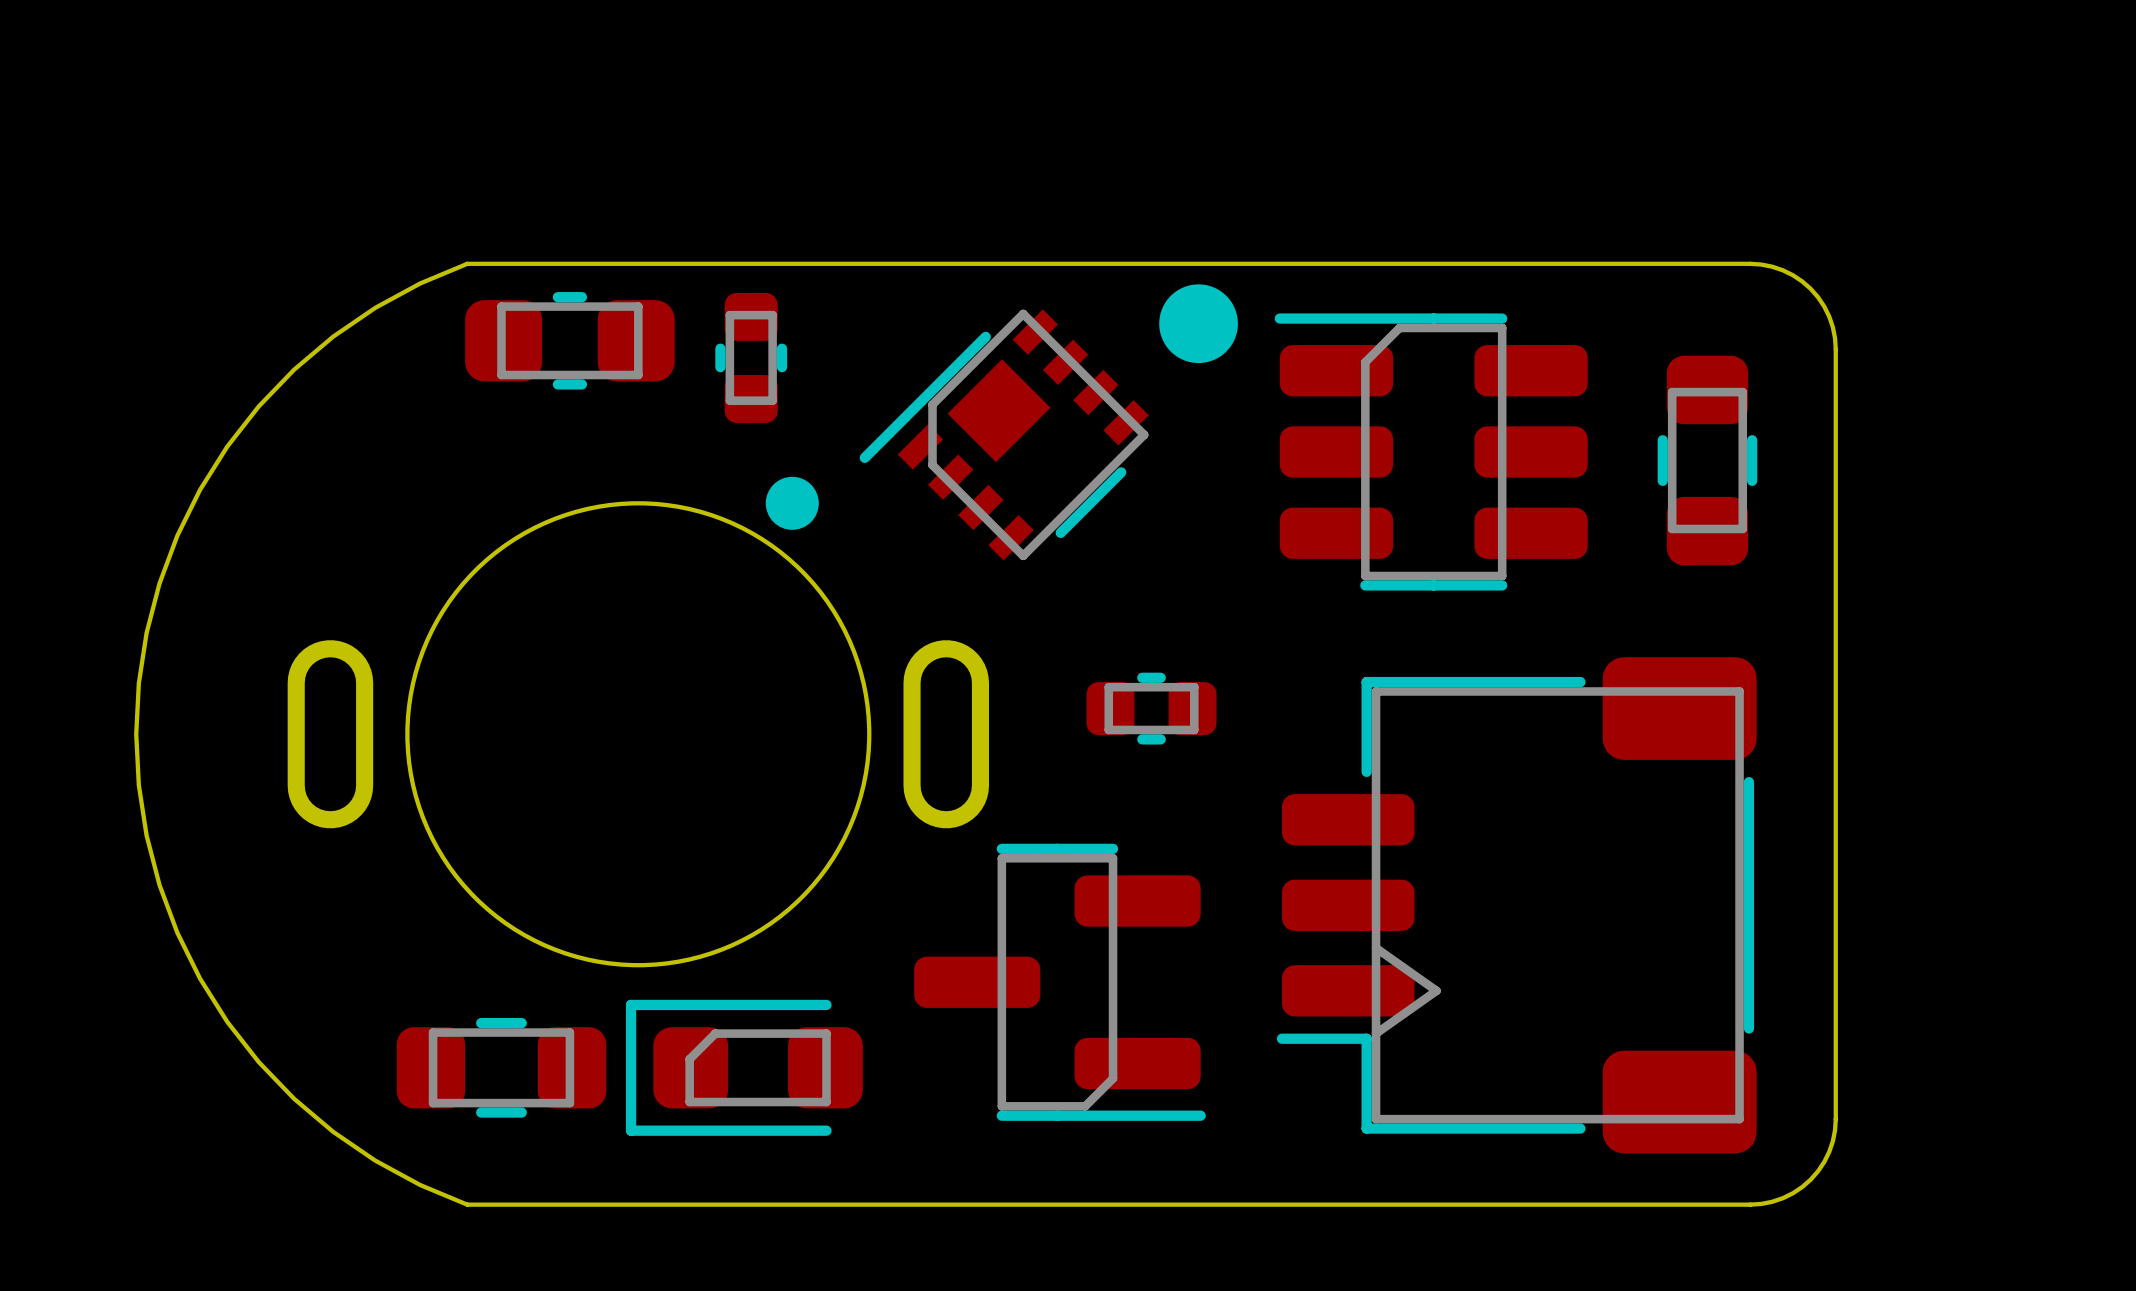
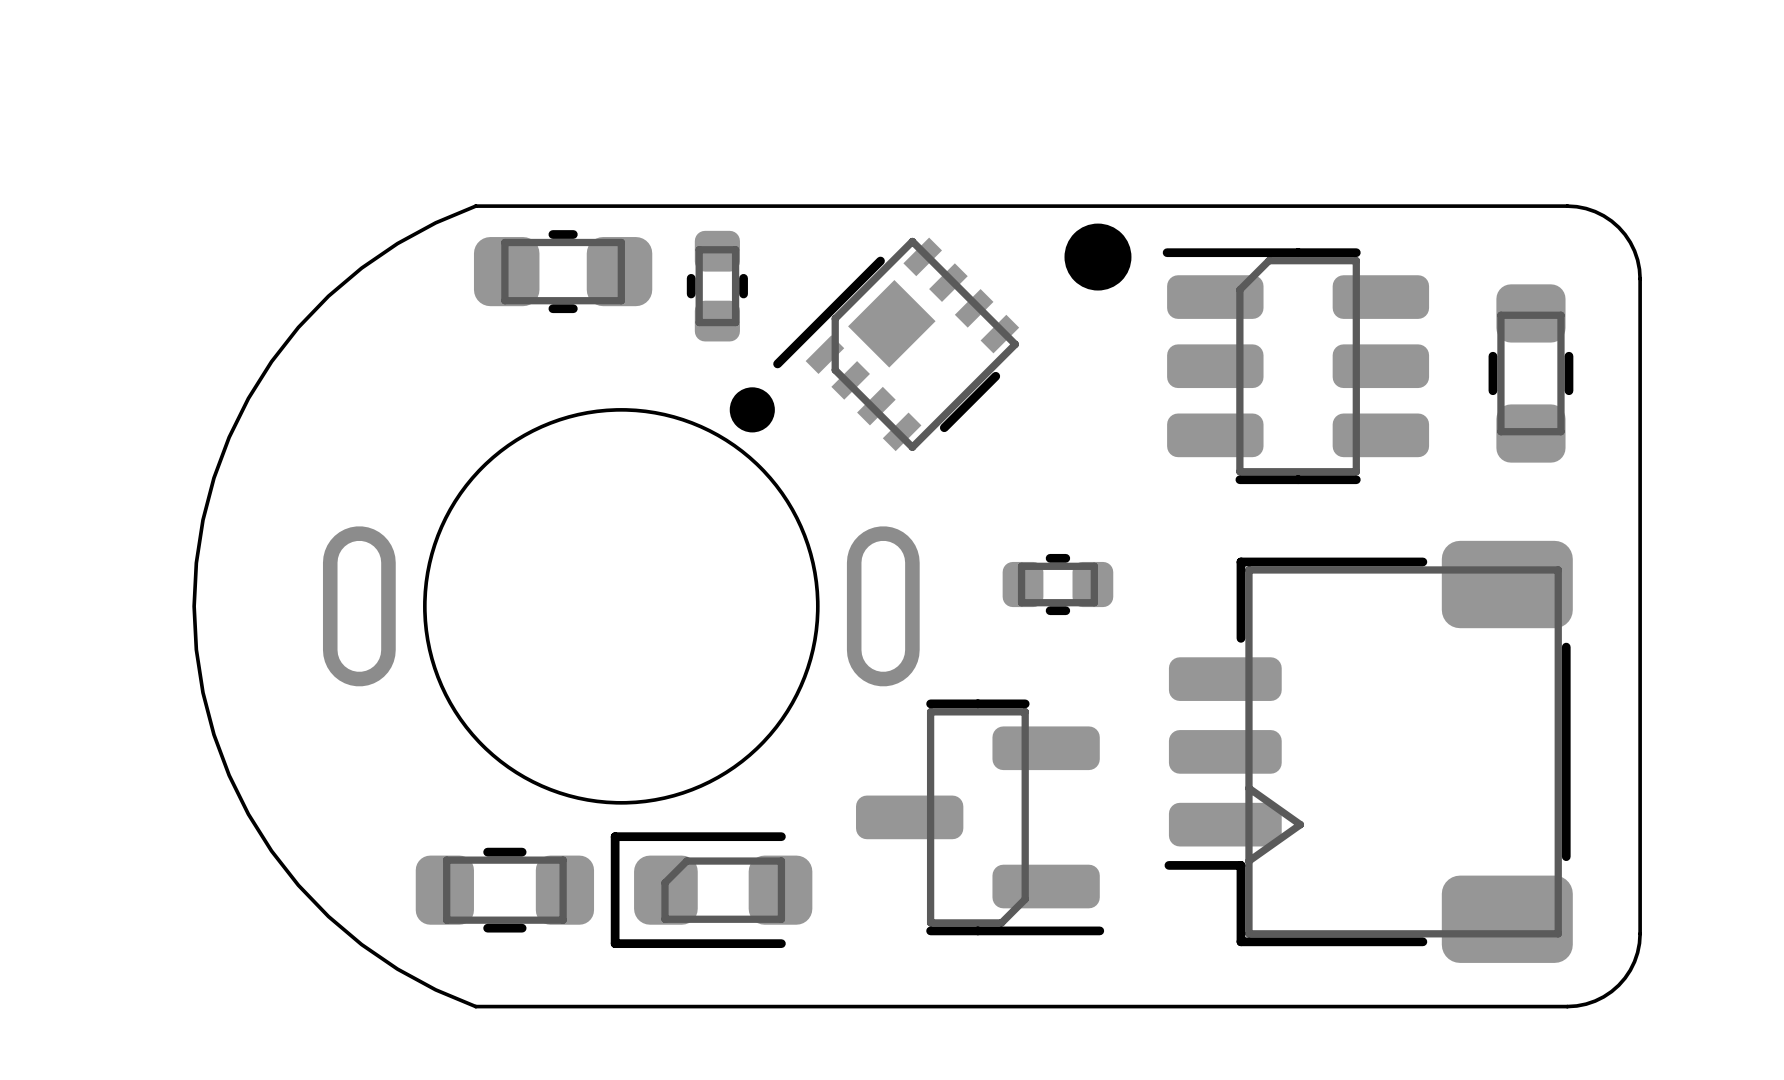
part position: (1004, 434) -> (896, 344)

